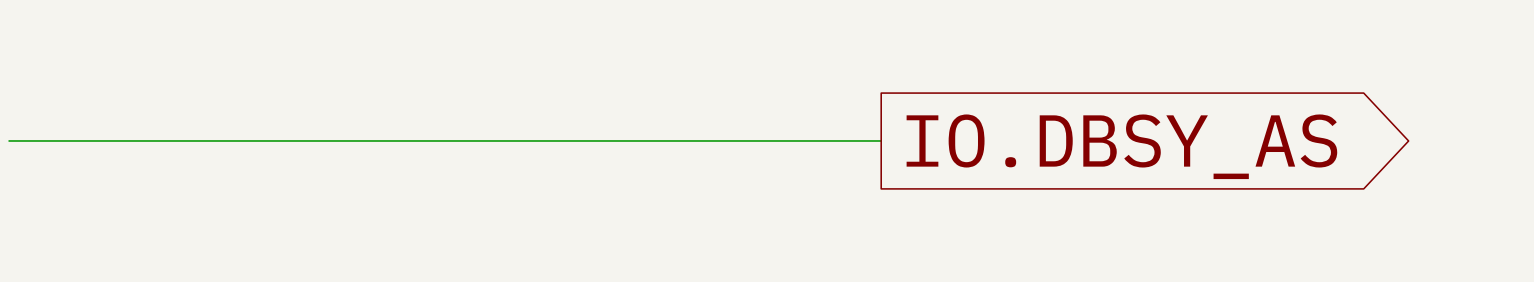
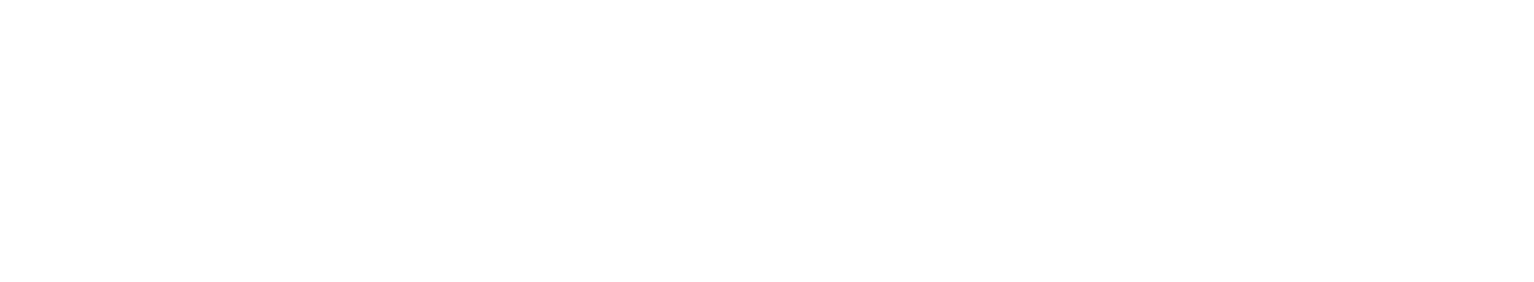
wire: (9, 140) (881, 140) -> none
global label: IO.DBSY_AS (1121, 146) -> none

